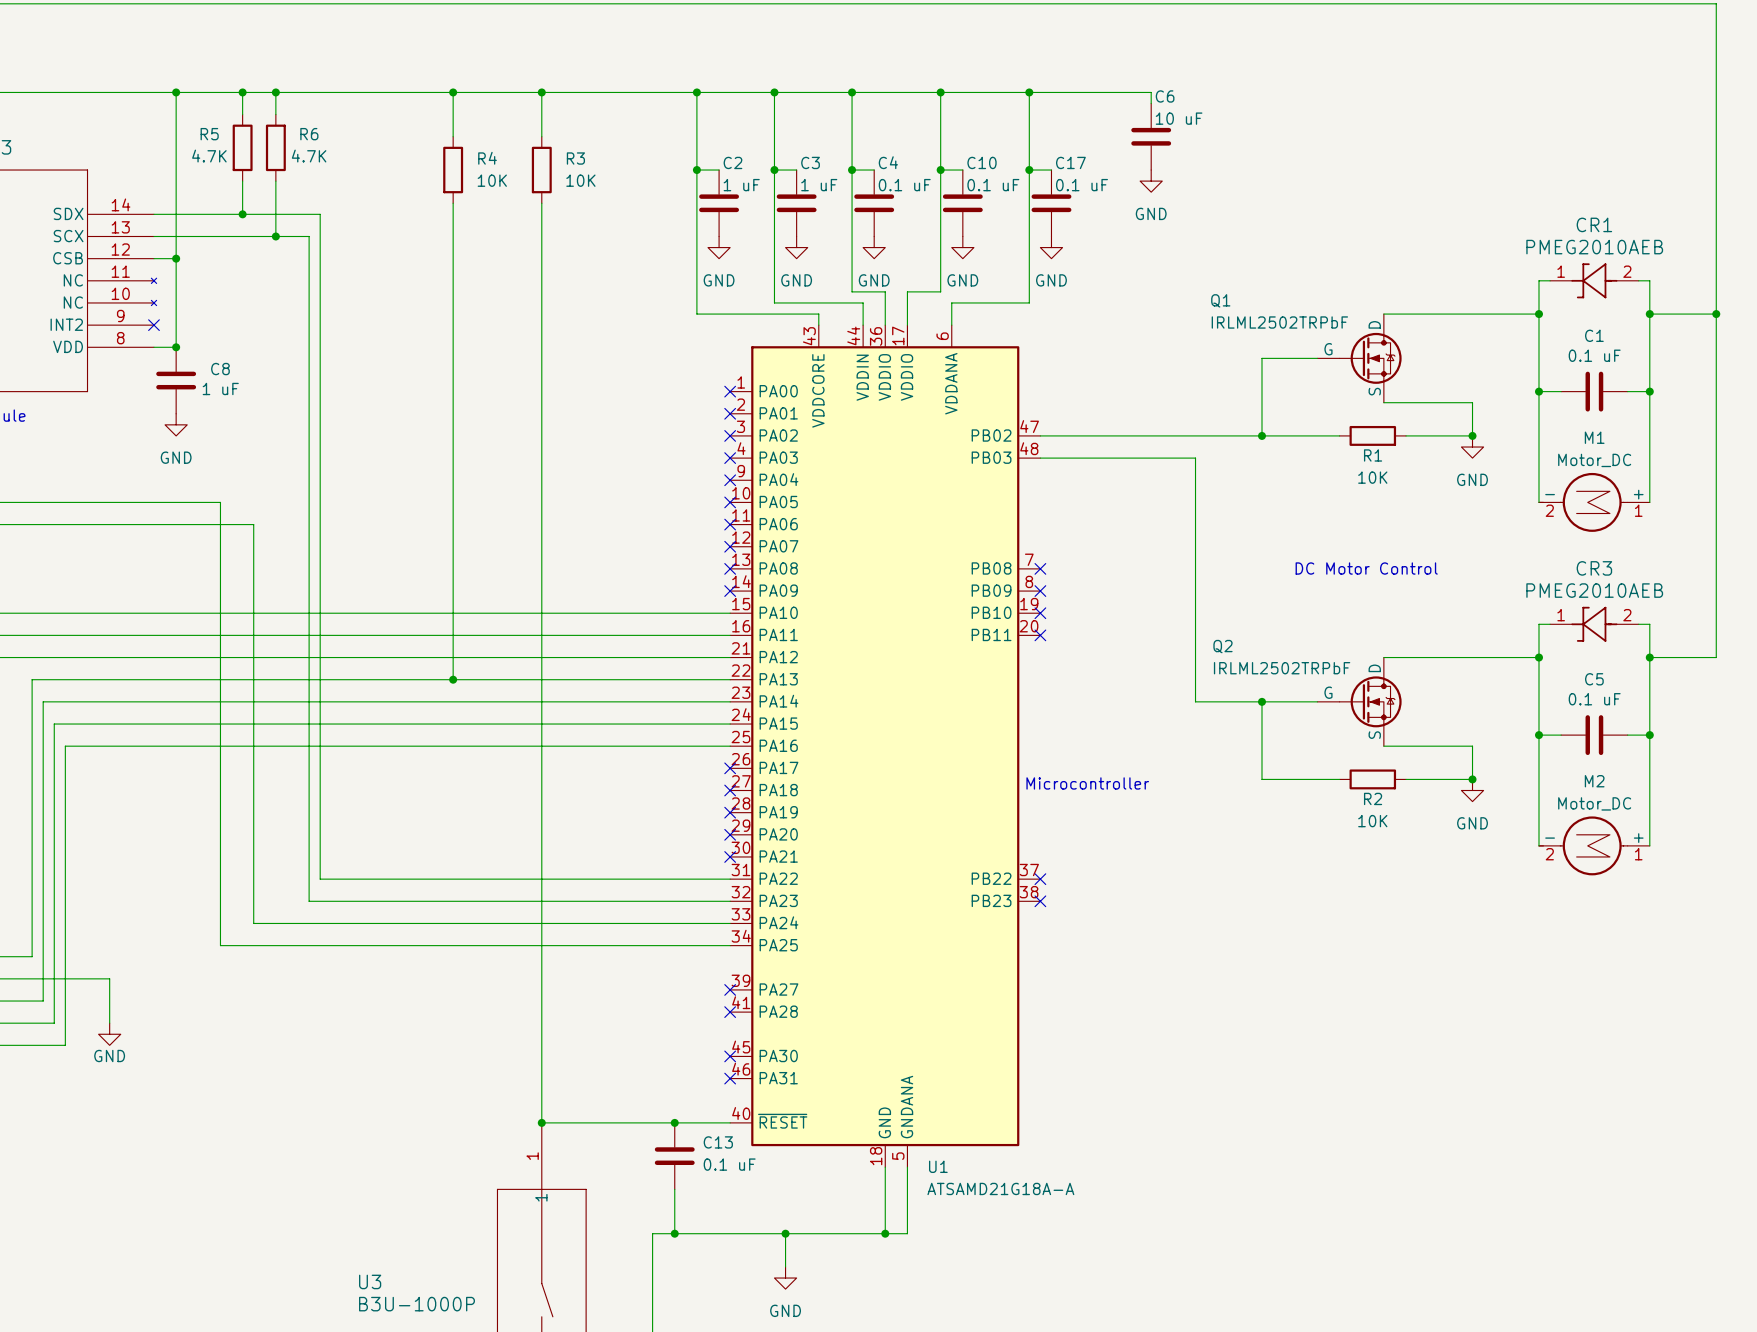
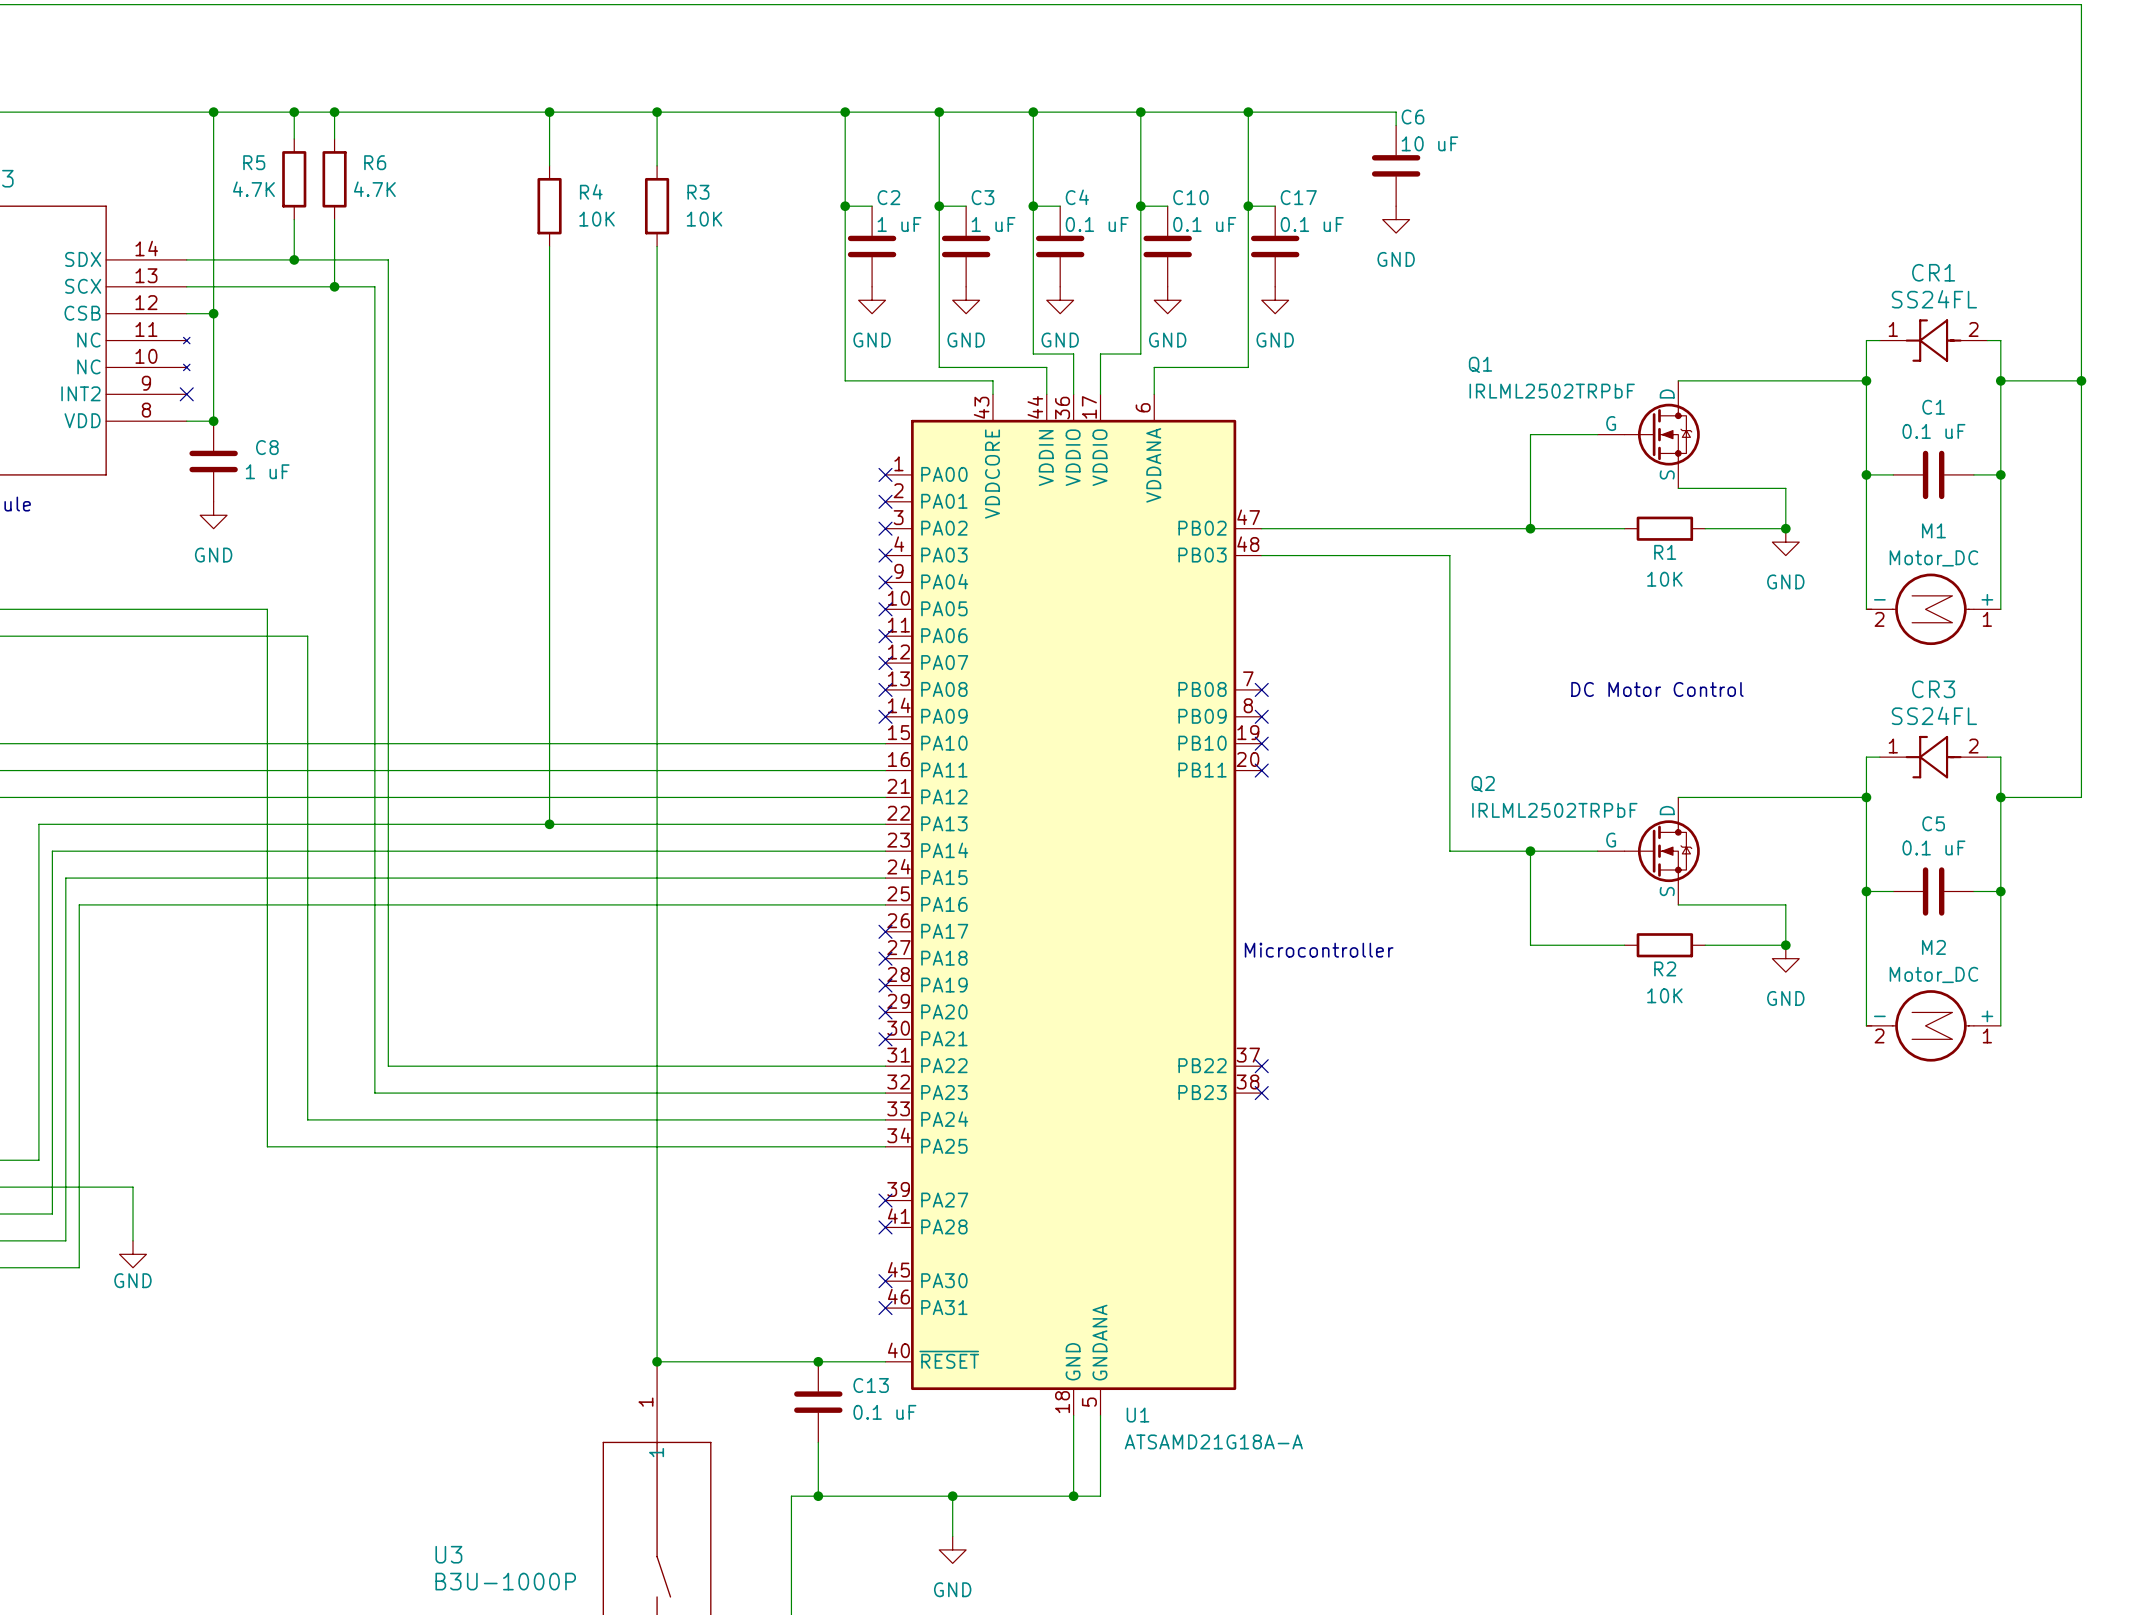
CR1 value: PMEG2010AEB (1594, 247) -> SS24FL (1934, 299)
CR3 value: PMEG2010AEB (1594, 590) -> SS24FL (1934, 715)

